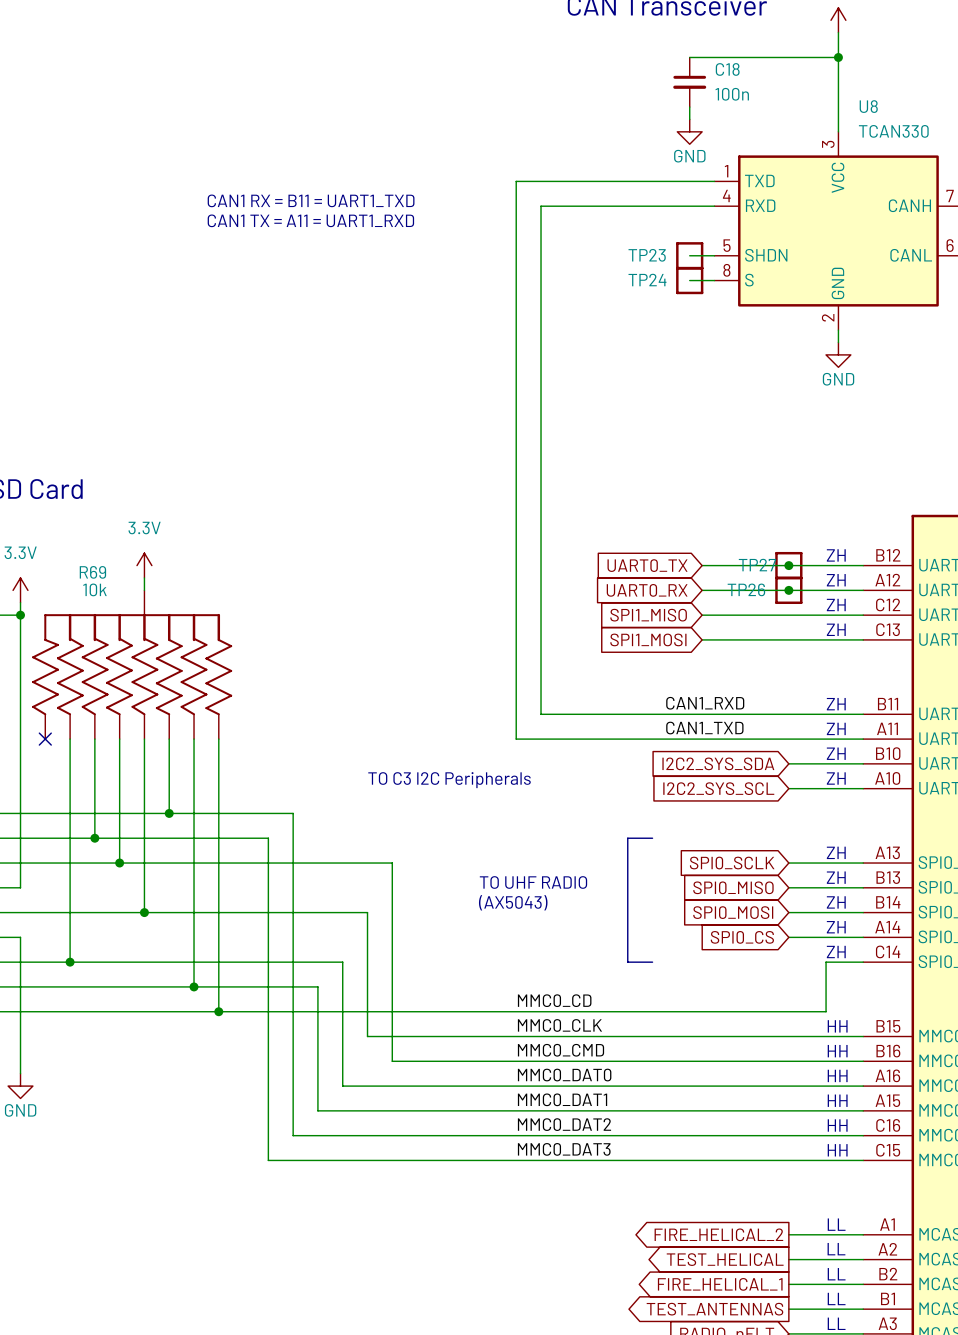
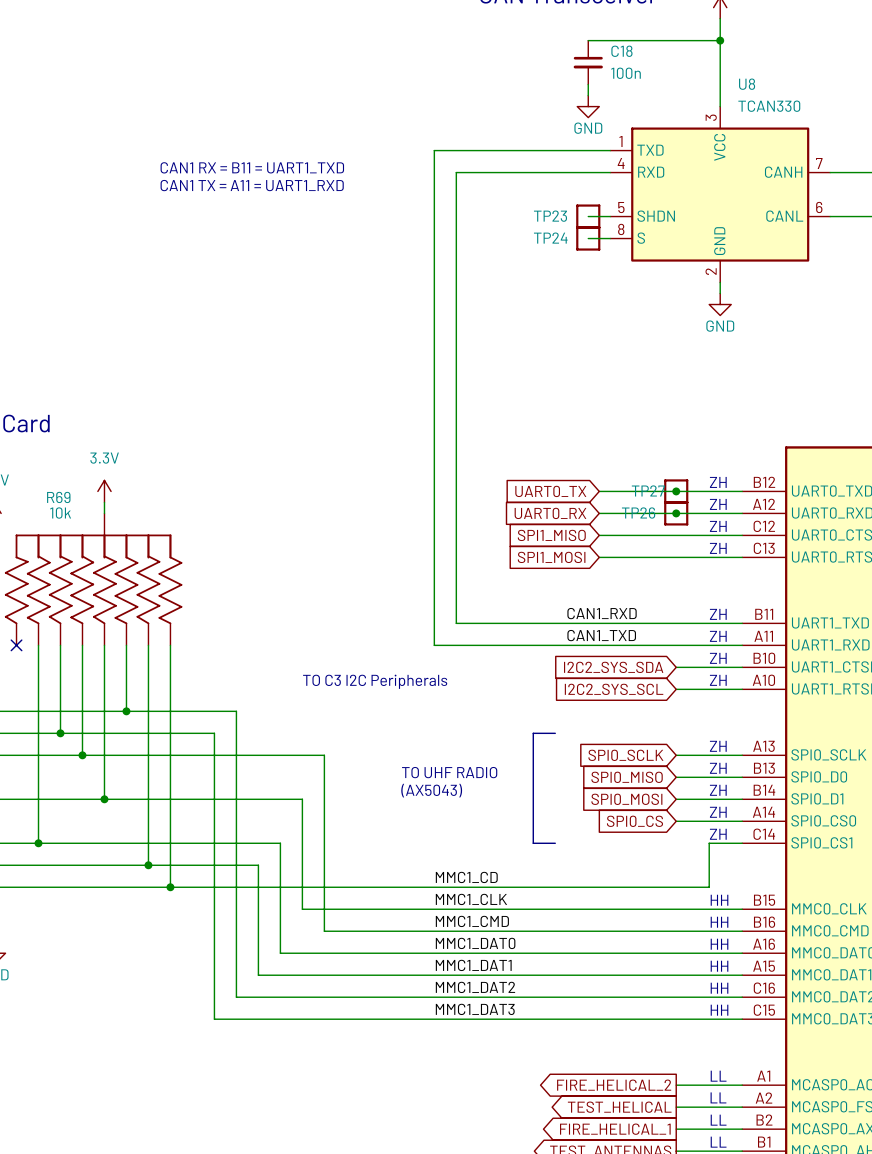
label: MMC0_CD (554, 1000) -> MMC1_CD (466, 877)
label: MMC0_CLK (559, 1025) -> MMC1_CLK (471, 899)
label: MMC0_CMD (561, 1050) -> MMC1_CMD (472, 921)
label: MMC0_DAT0 (564, 1075) -> MMC1_DAT0 (475, 943)
label: MMC0_DAT1 (562, 1099) -> MMC1_DAT1 (473, 965)
label: MMC0_DAT2 (564, 1124) -> MMC1_DAT2 (475, 987)
label: MMC0_DAT3 (564, 1149) -> MMC1_DAT3 (475, 1009)

